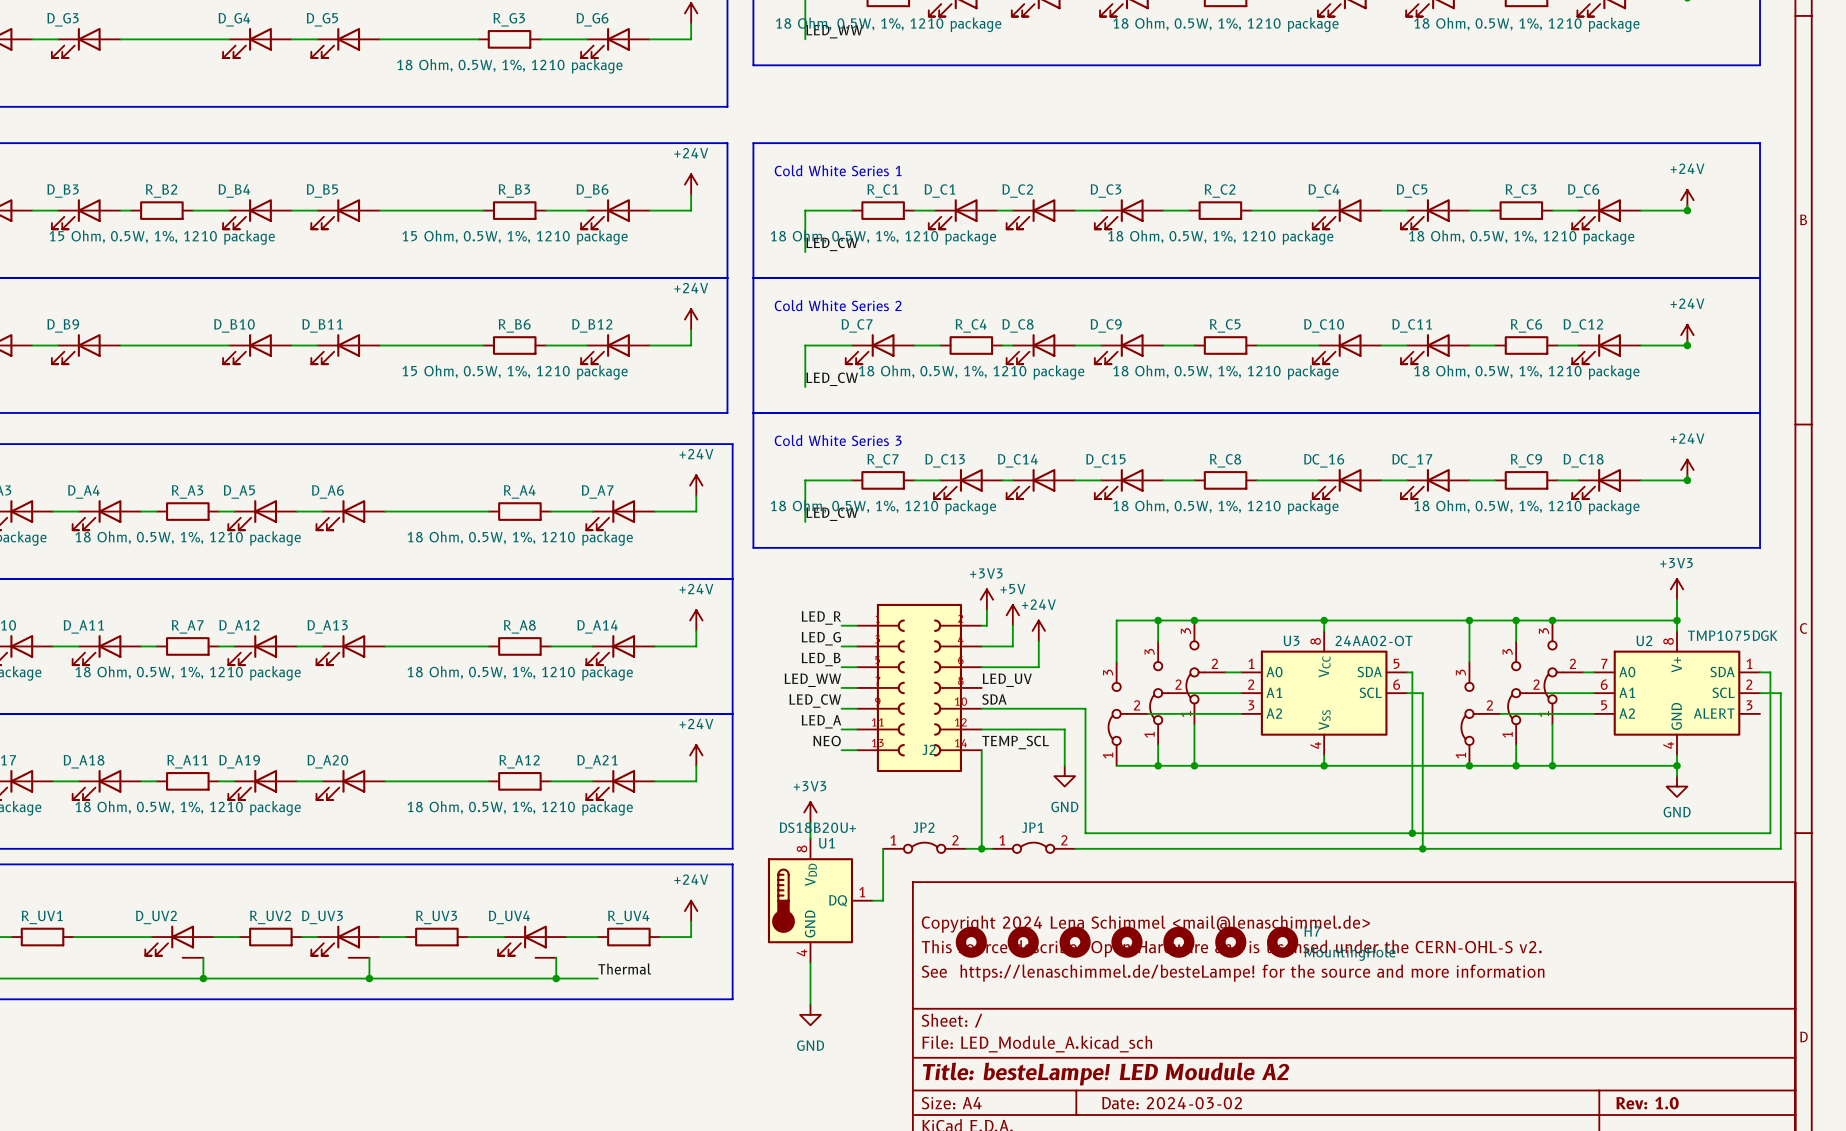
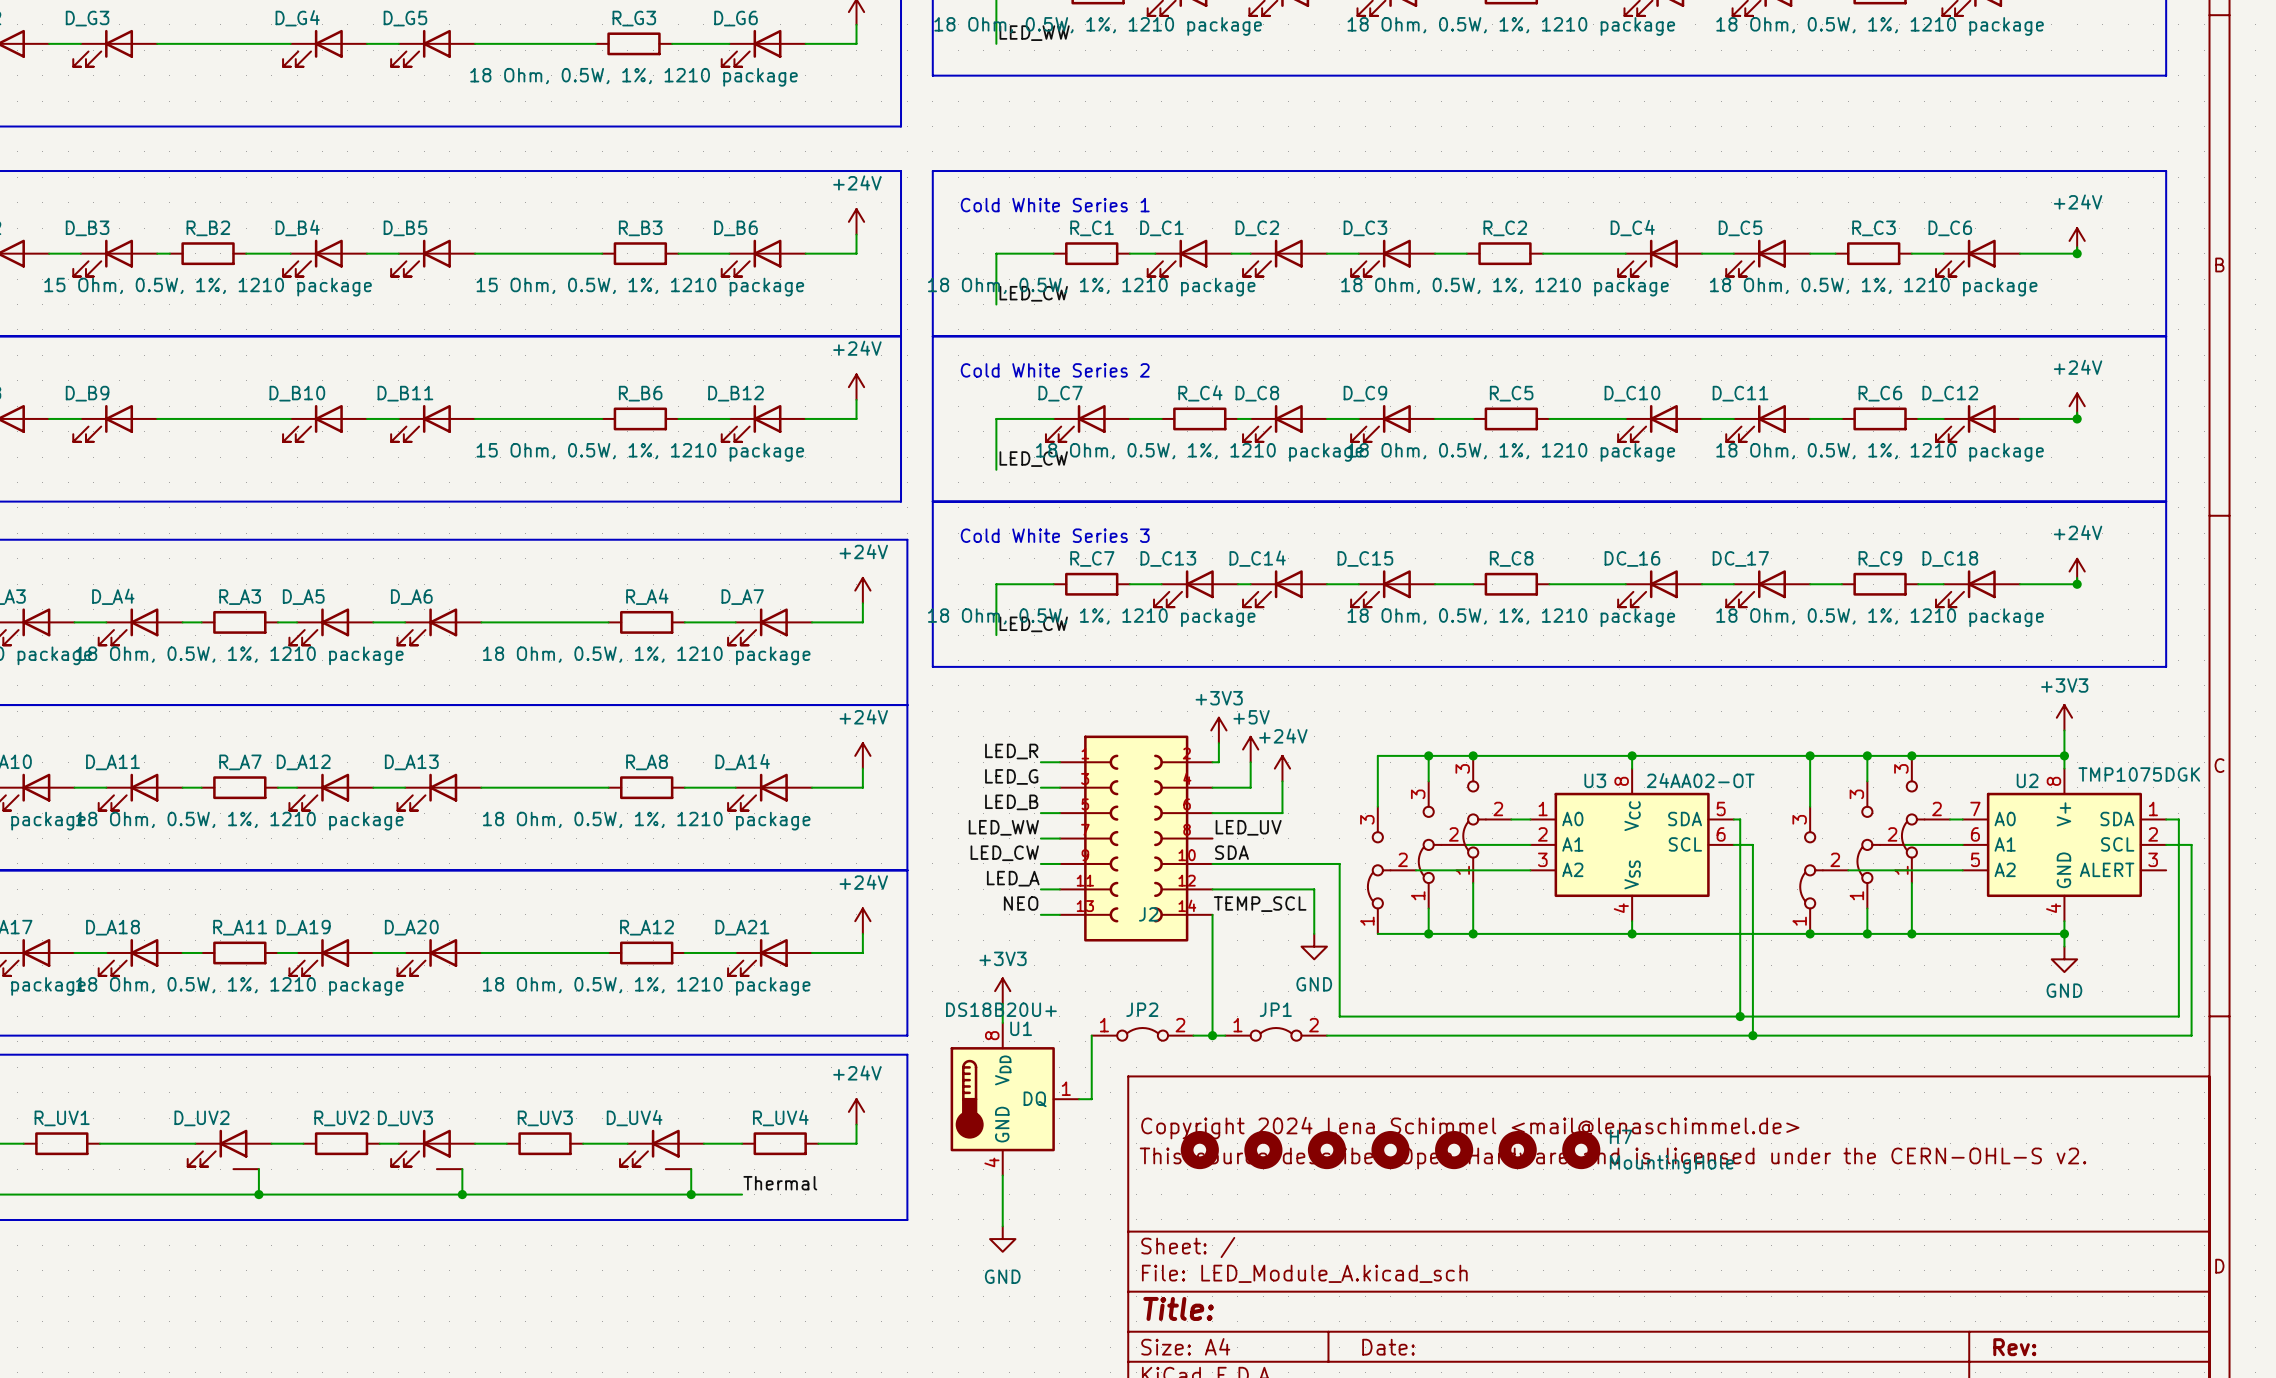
title block: See https://lenaschimmel.de/besteLampe! for the source and more information (1233, 973) -> none
title block: Title: besteLampe! LED Moudule A2 (1106, 1074) -> Title: (1178, 1308)
title block: Date: 2024-03-02 (1172, 1103) -> Date: (1388, 1347)
title block: Rev: 1.0 (1647, 1103) -> Rev: (2014, 1347)

